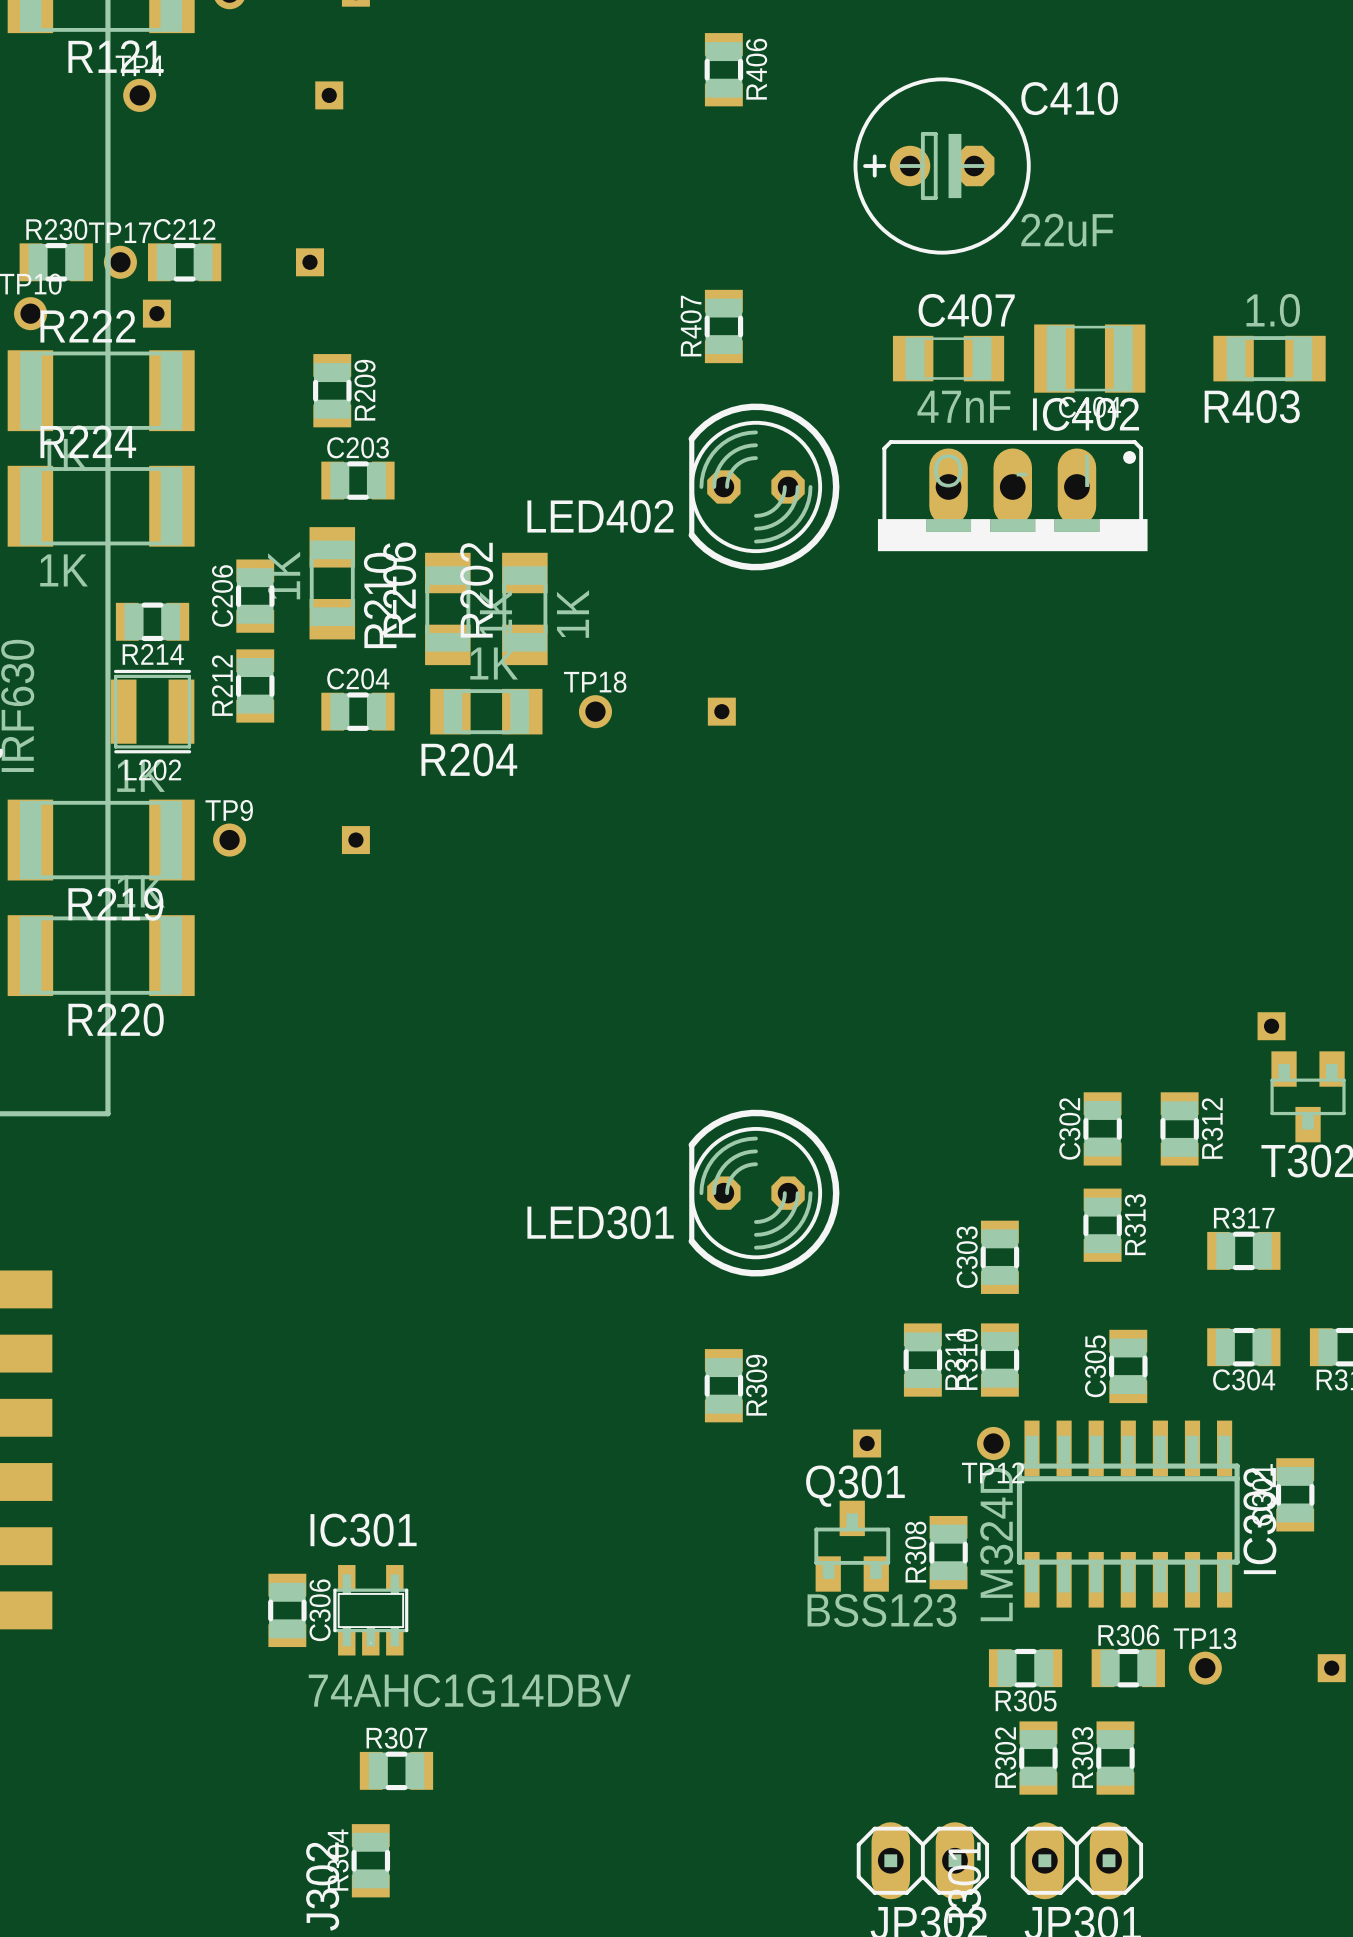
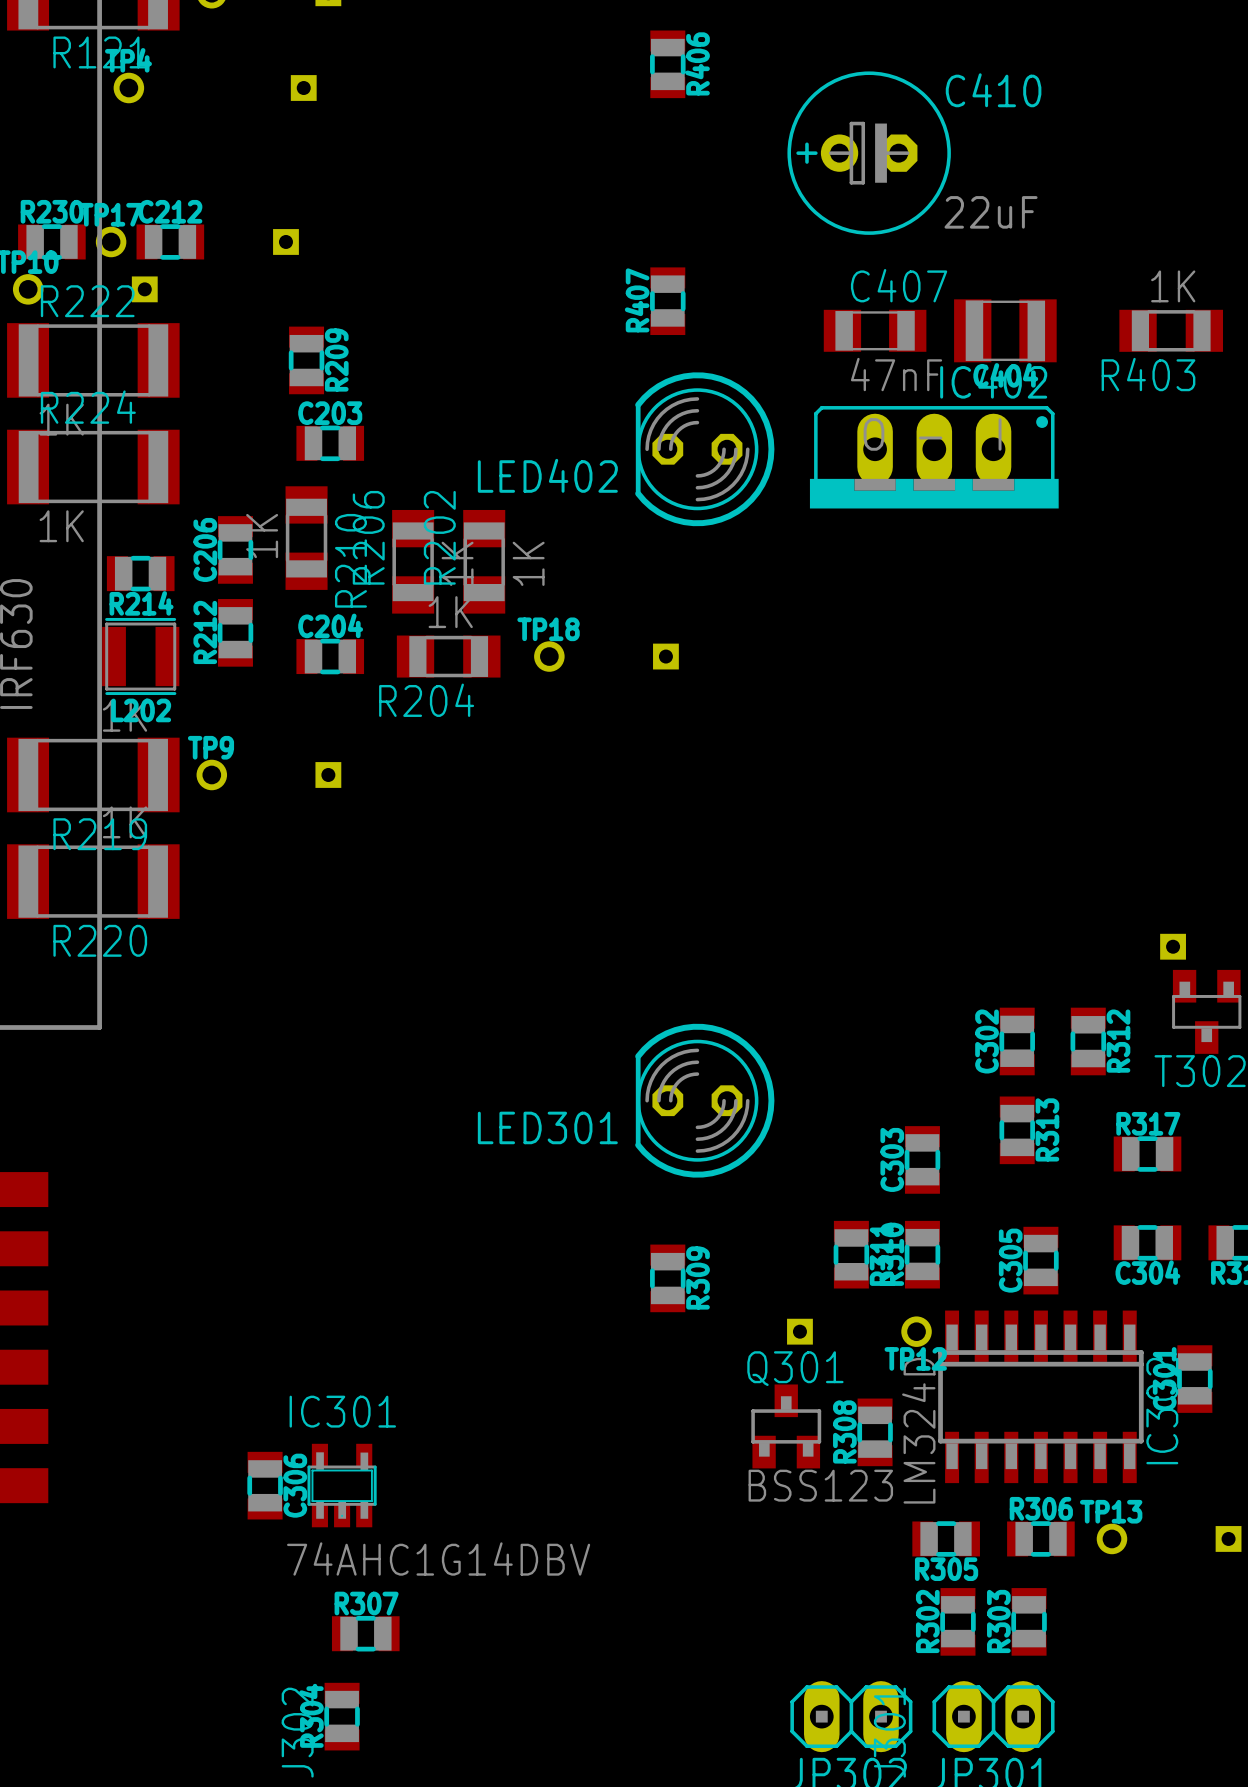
R403 value: 1.0 (1273, 310) -> 1K (1173, 286)

